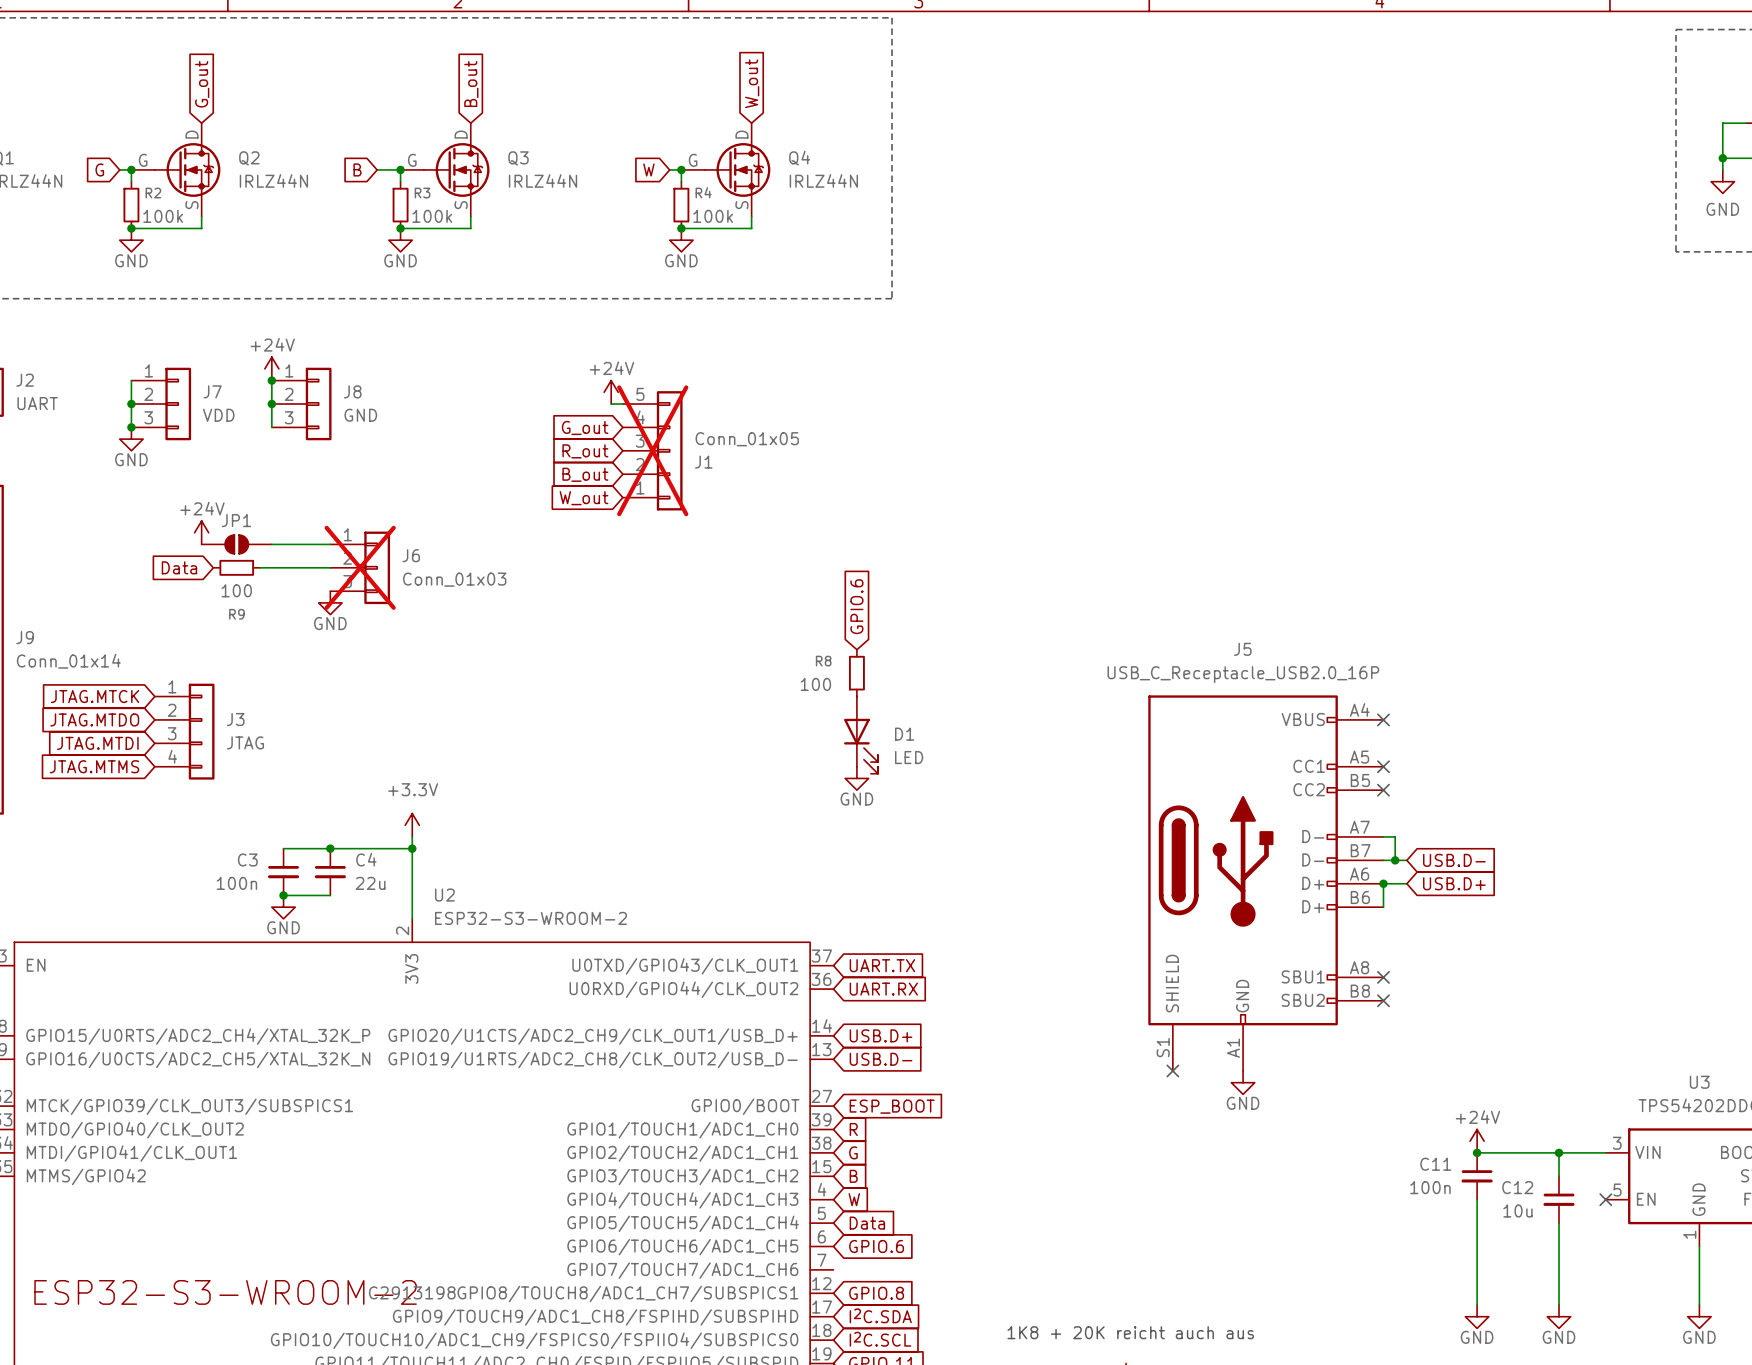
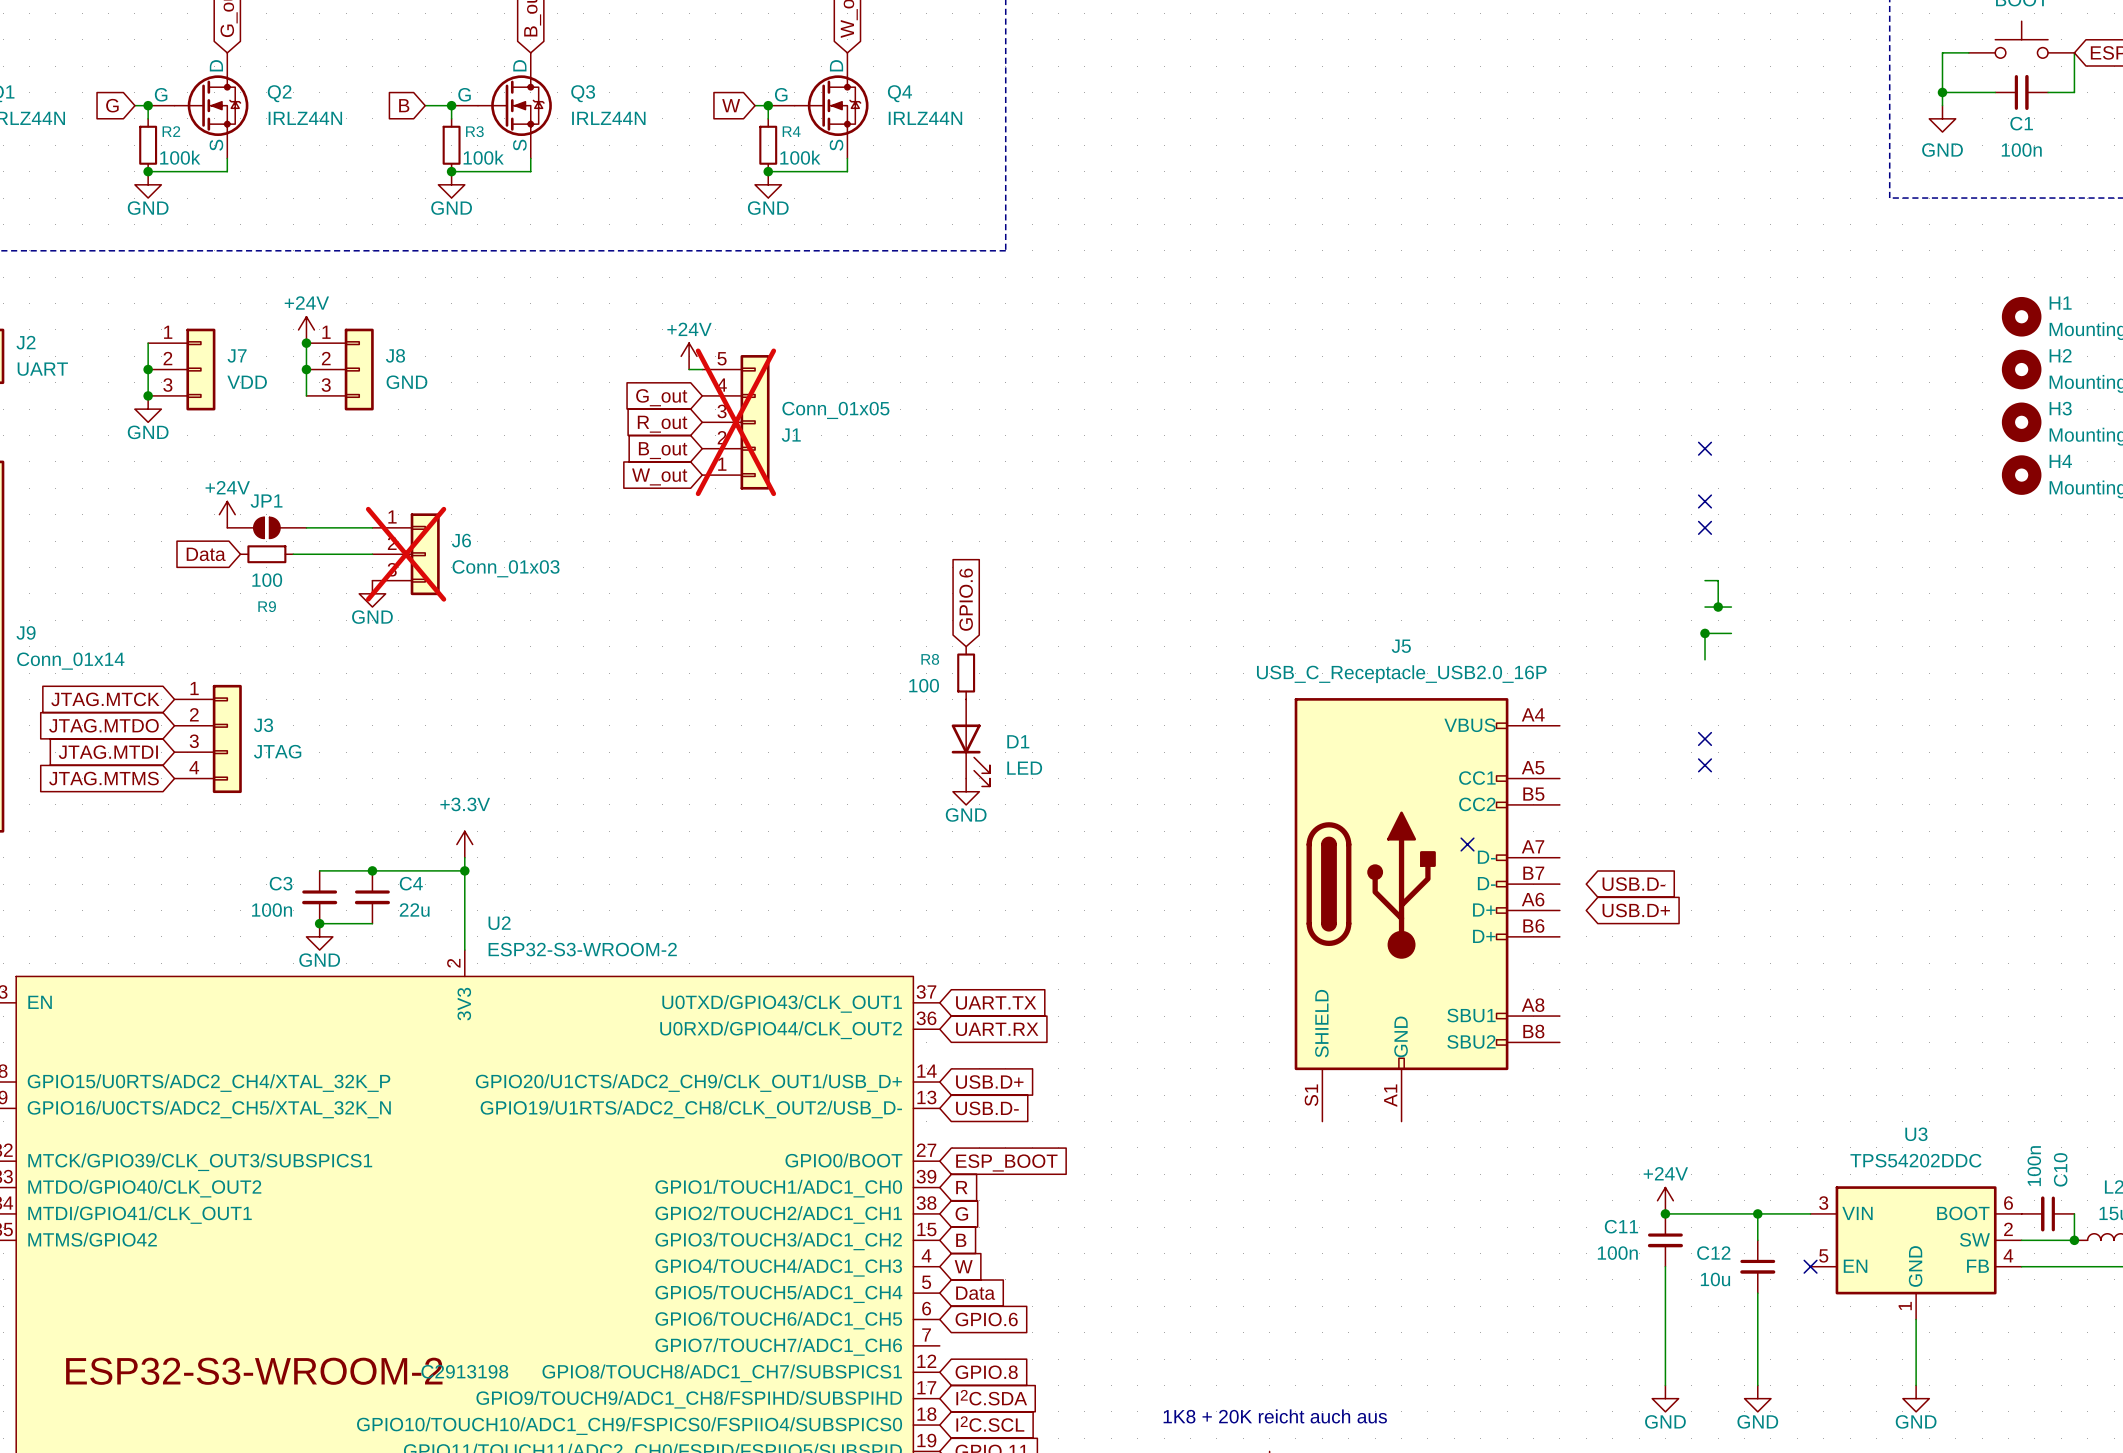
no-connect mark: none -> (1705, 448)
no-connect mark: none -> (1705, 501)
no-connect mark: none -> (1705, 527)
wire: none -> (1705, 580) (1718, 580) (1718, 607)
wire: none -> (1705, 607) (1731, 607)
junction: none -> (1718, 607)
junction: none -> (1705, 633)
wire: none -> (1731, 633) (1705, 633) (1705, 659)
no-connect mark: (1383, 719) -> none
no-connect mark: none -> (1705, 738)
no-connect mark: none -> (1705, 765)
no-connect mark: (1383, 766) -> none
no-connect mark: (1383, 790) -> none
no-connect mark: none -> (1467, 844)
wire: (1383, 836) (1395, 836) (1395, 860) -> none
wire: (1383, 860) (1406, 860) -> none
junction: (1395, 860) -> none
junction: (1383, 883) -> none
wire: (1406, 883) (1383, 883) (1383, 907) -> none
no-connect mark: (1383, 977) -> none
no-connect mark: (1383, 1000) -> none
no-connect mark: (1172, 1070) -> none
power symbol: GND (1243, 1082) -> none

